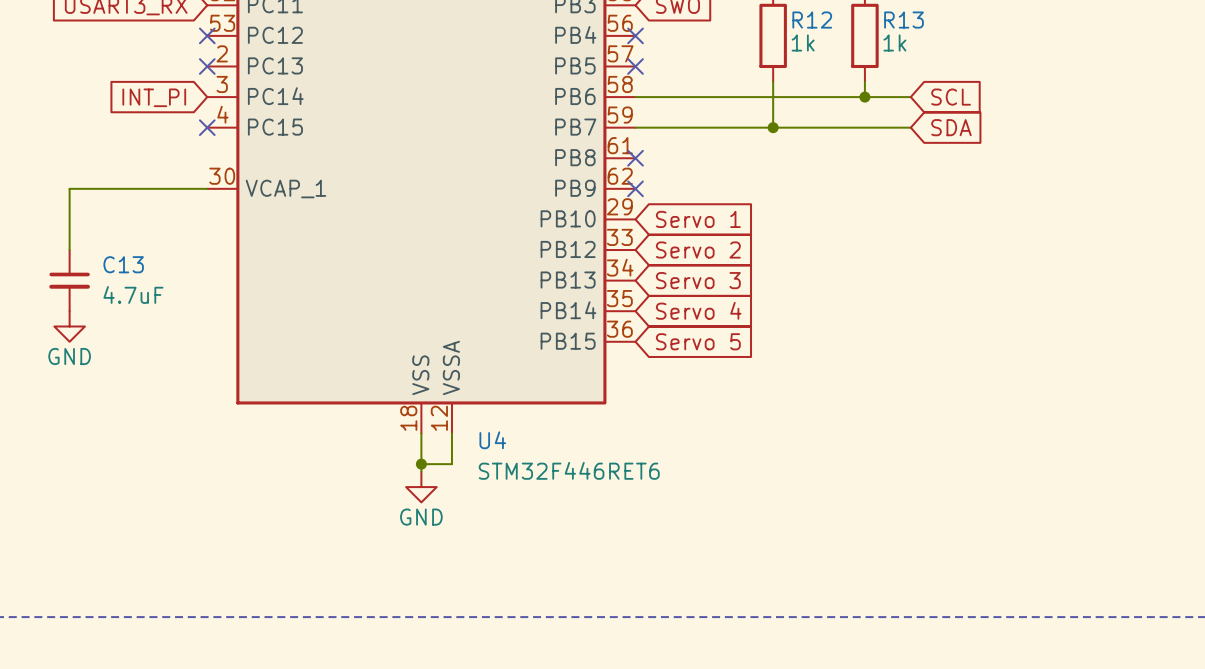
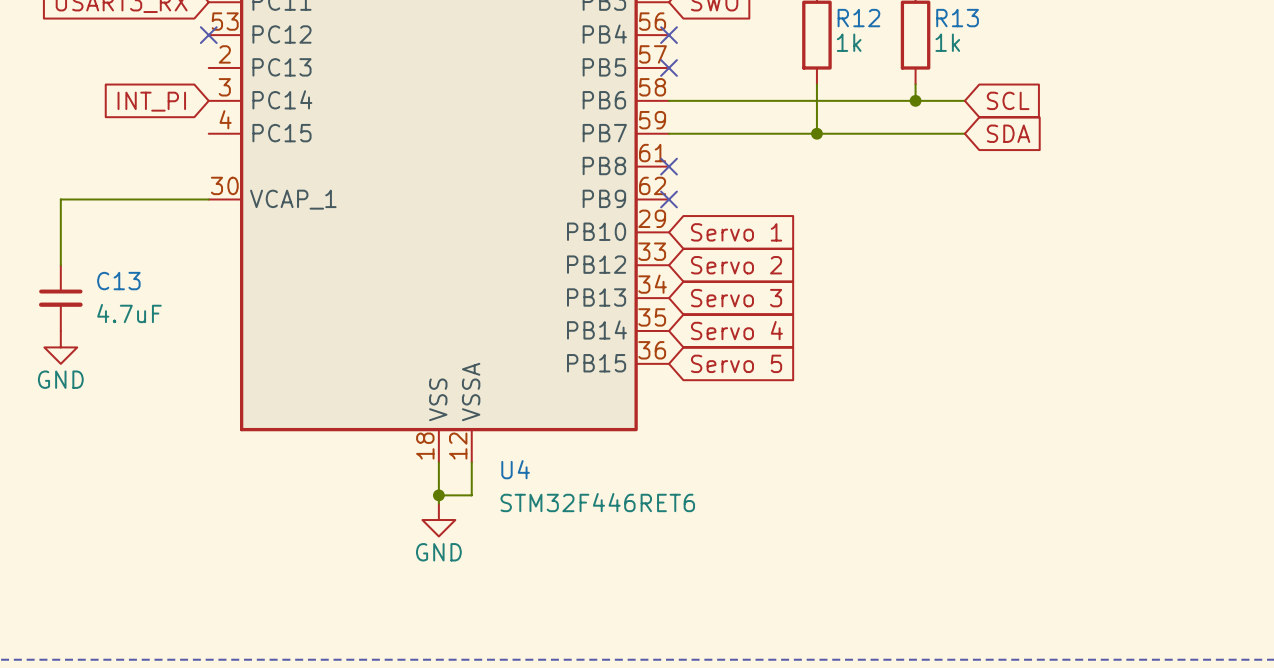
no-connect mark: (207, 66) -> none
no-connect mark: (207, 127) -> none

